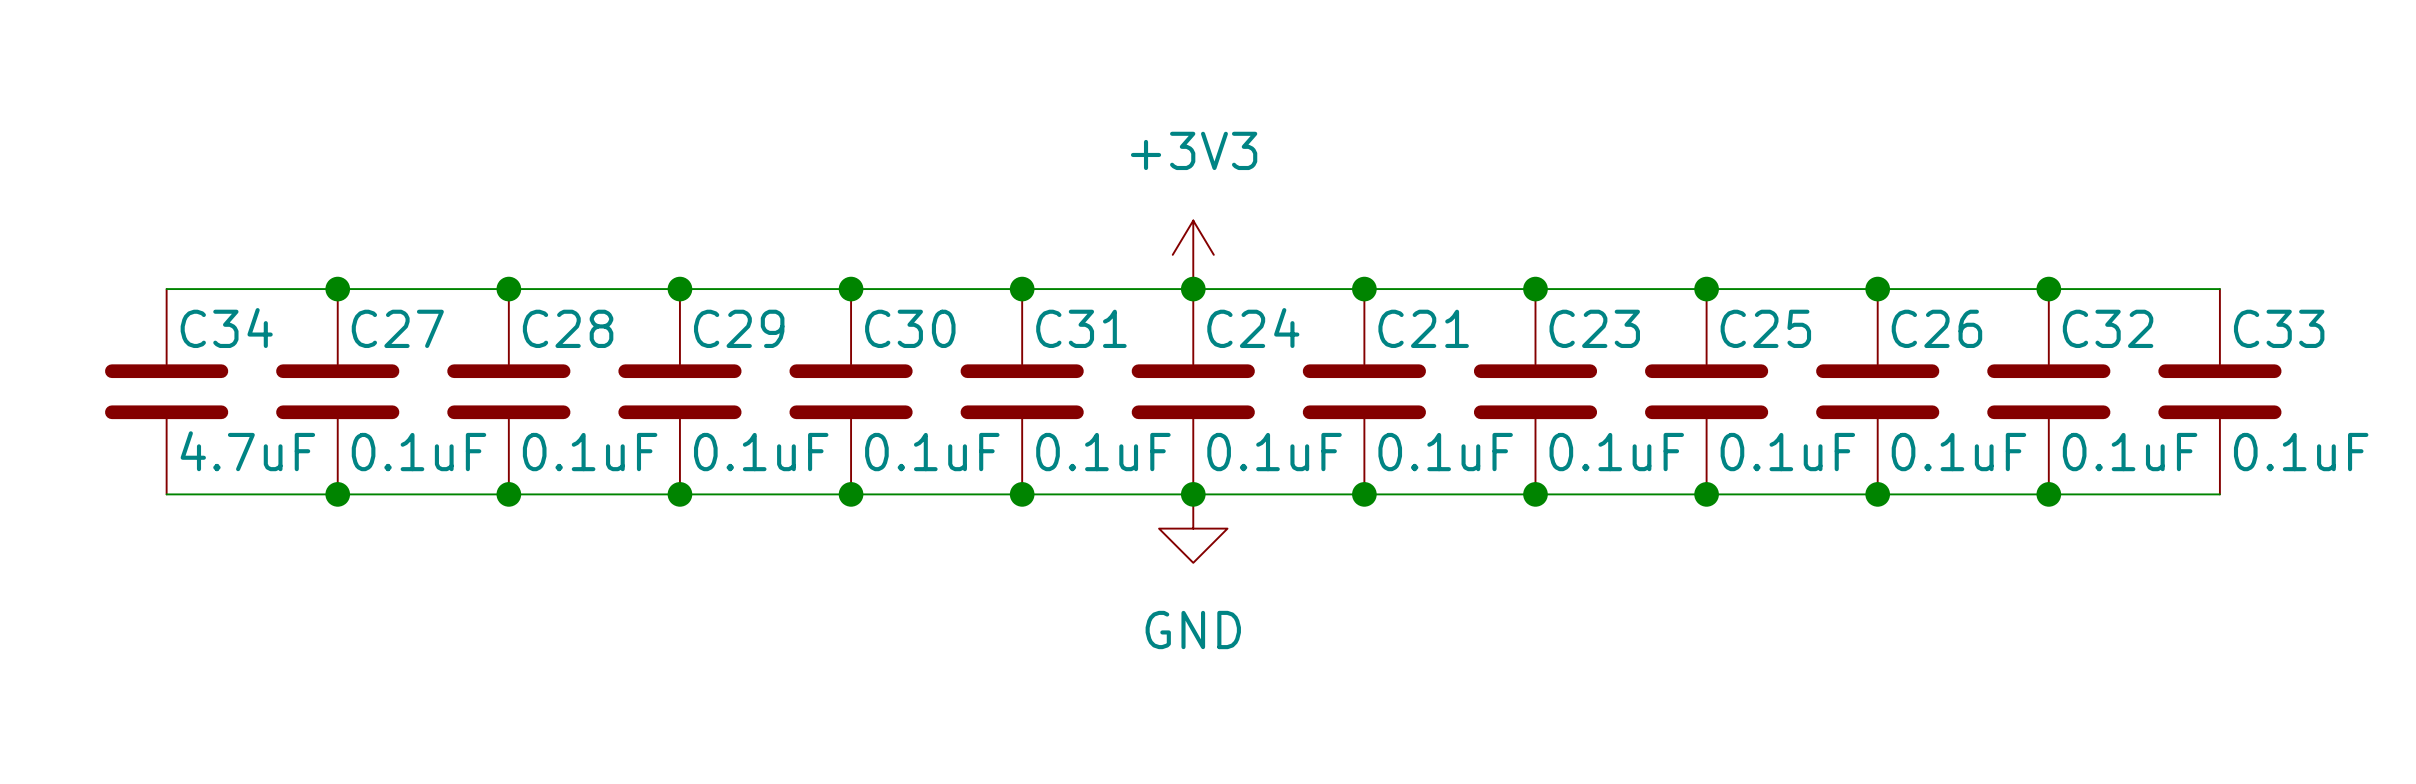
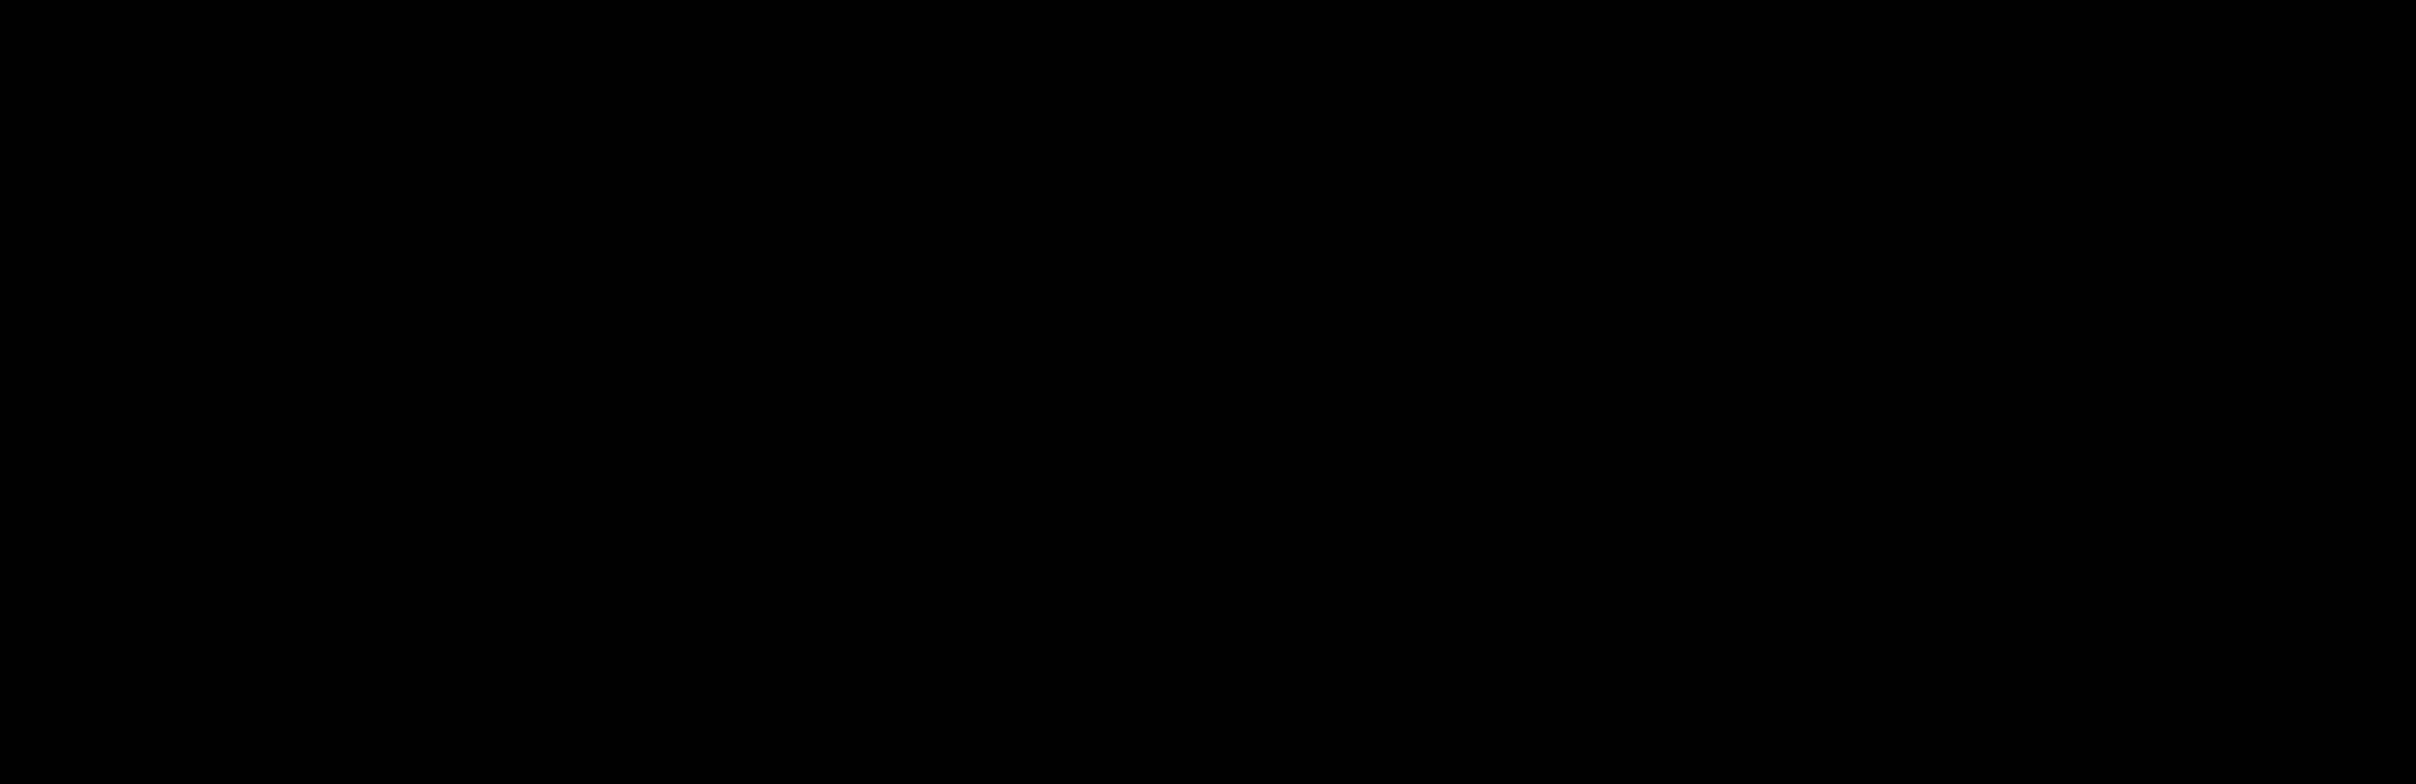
power symbol: +3V3 (1193, 254) -> none
wire: (166, 289) (2219, 289) -> none
junction: (337, 289) -> none
junction: (508, 289) -> none
junction: (679, 289) -> none
junction: (851, 289) -> none
junction: (1022, 289) -> none
junction: (1193, 289) -> none
junction: (1364, 289) -> none
junction: (1535, 289) -> none
junction: (1706, 289) -> none
junction: (1877, 289) -> none
junction: (2048, 289) -> none
C34: 4.7uF (166, 391) -> none
C27: 0.1uF (337, 391) -> none
C28: 0.1uF (508, 391) -> none
C29: 0.1uF (679, 391) -> none
C30: 0.1uF (851, 391) -> none
C31: 0.1uF (1022, 391) -> none
C24: 0.1uF (1193, 391) -> none
C21: 0.1uF (1364, 391) -> none
C23: 0.1uF (1535, 391) -> none
C25: 0.1uF (1706, 391) -> none
C26: 0.1uF (1877, 391) -> none
C32: 0.1uF (2048, 391) -> none
C33: 0.1uF (2219, 391) -> none
wire: (166, 494) (2219, 494) -> none
junction: (337, 494) -> none
junction: (508, 494) -> none
junction: (679, 494) -> none
junction: (851, 494) -> none
junction: (1022, 494) -> none
junction: (1193, 494) -> none
junction: (1364, 494) -> none
junction: (1535, 494) -> none
junction: (1706, 494) -> none
junction: (1877, 494) -> none
junction: (2048, 494) -> none
power symbol: GND (1193, 528) -> none

